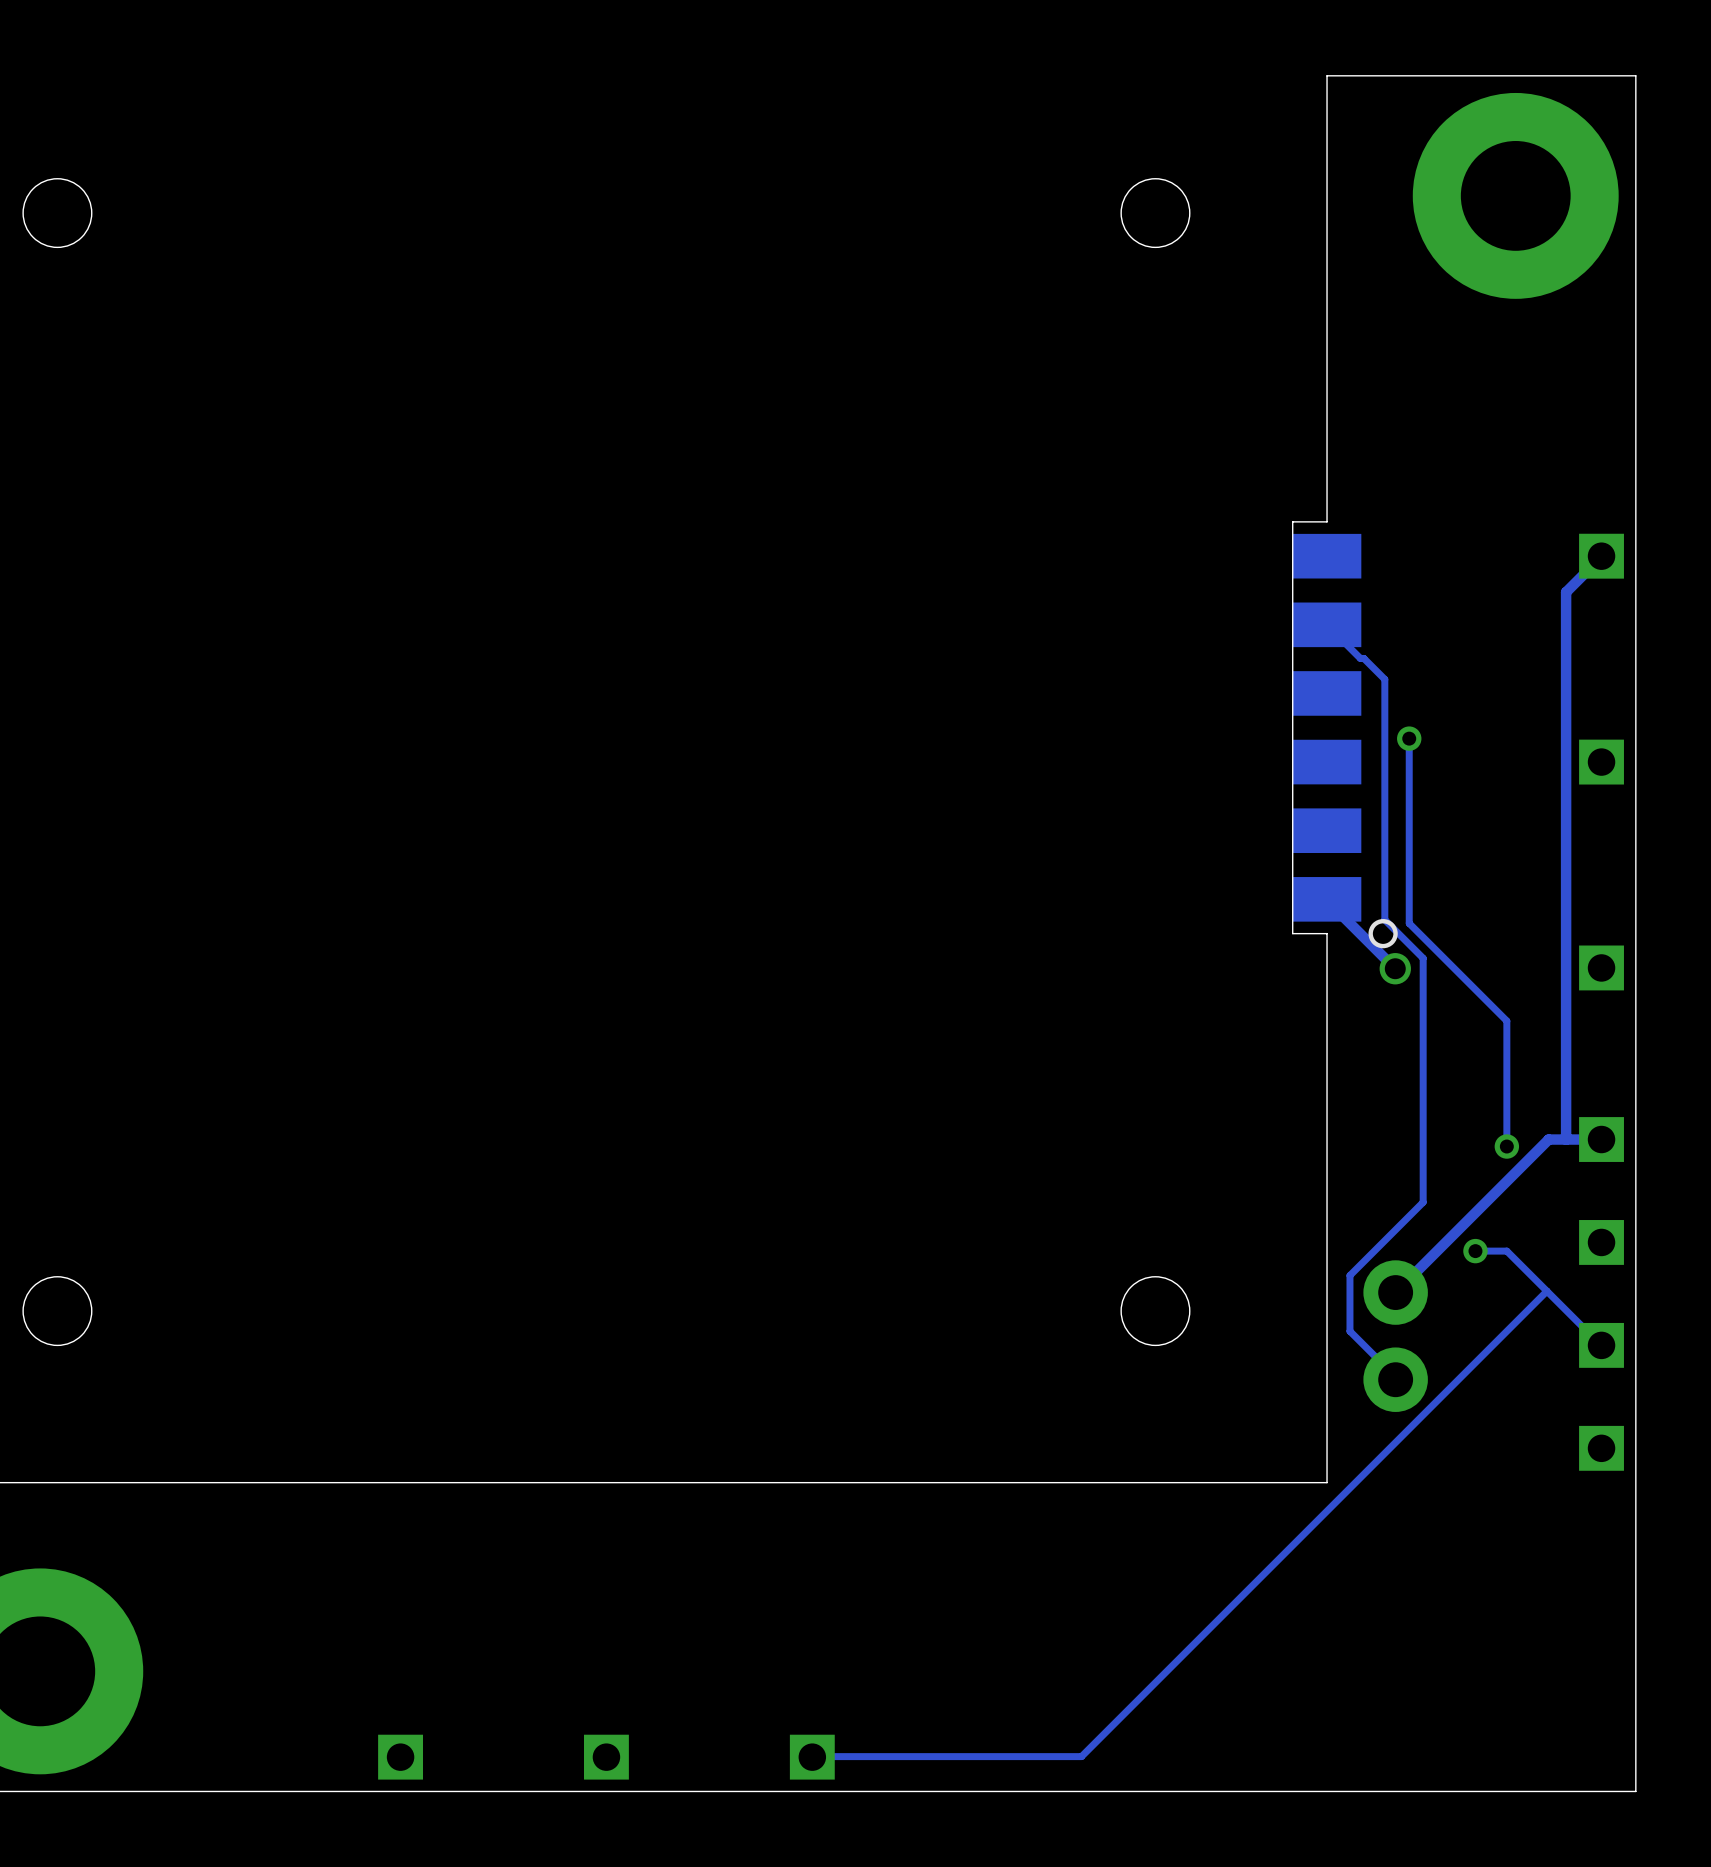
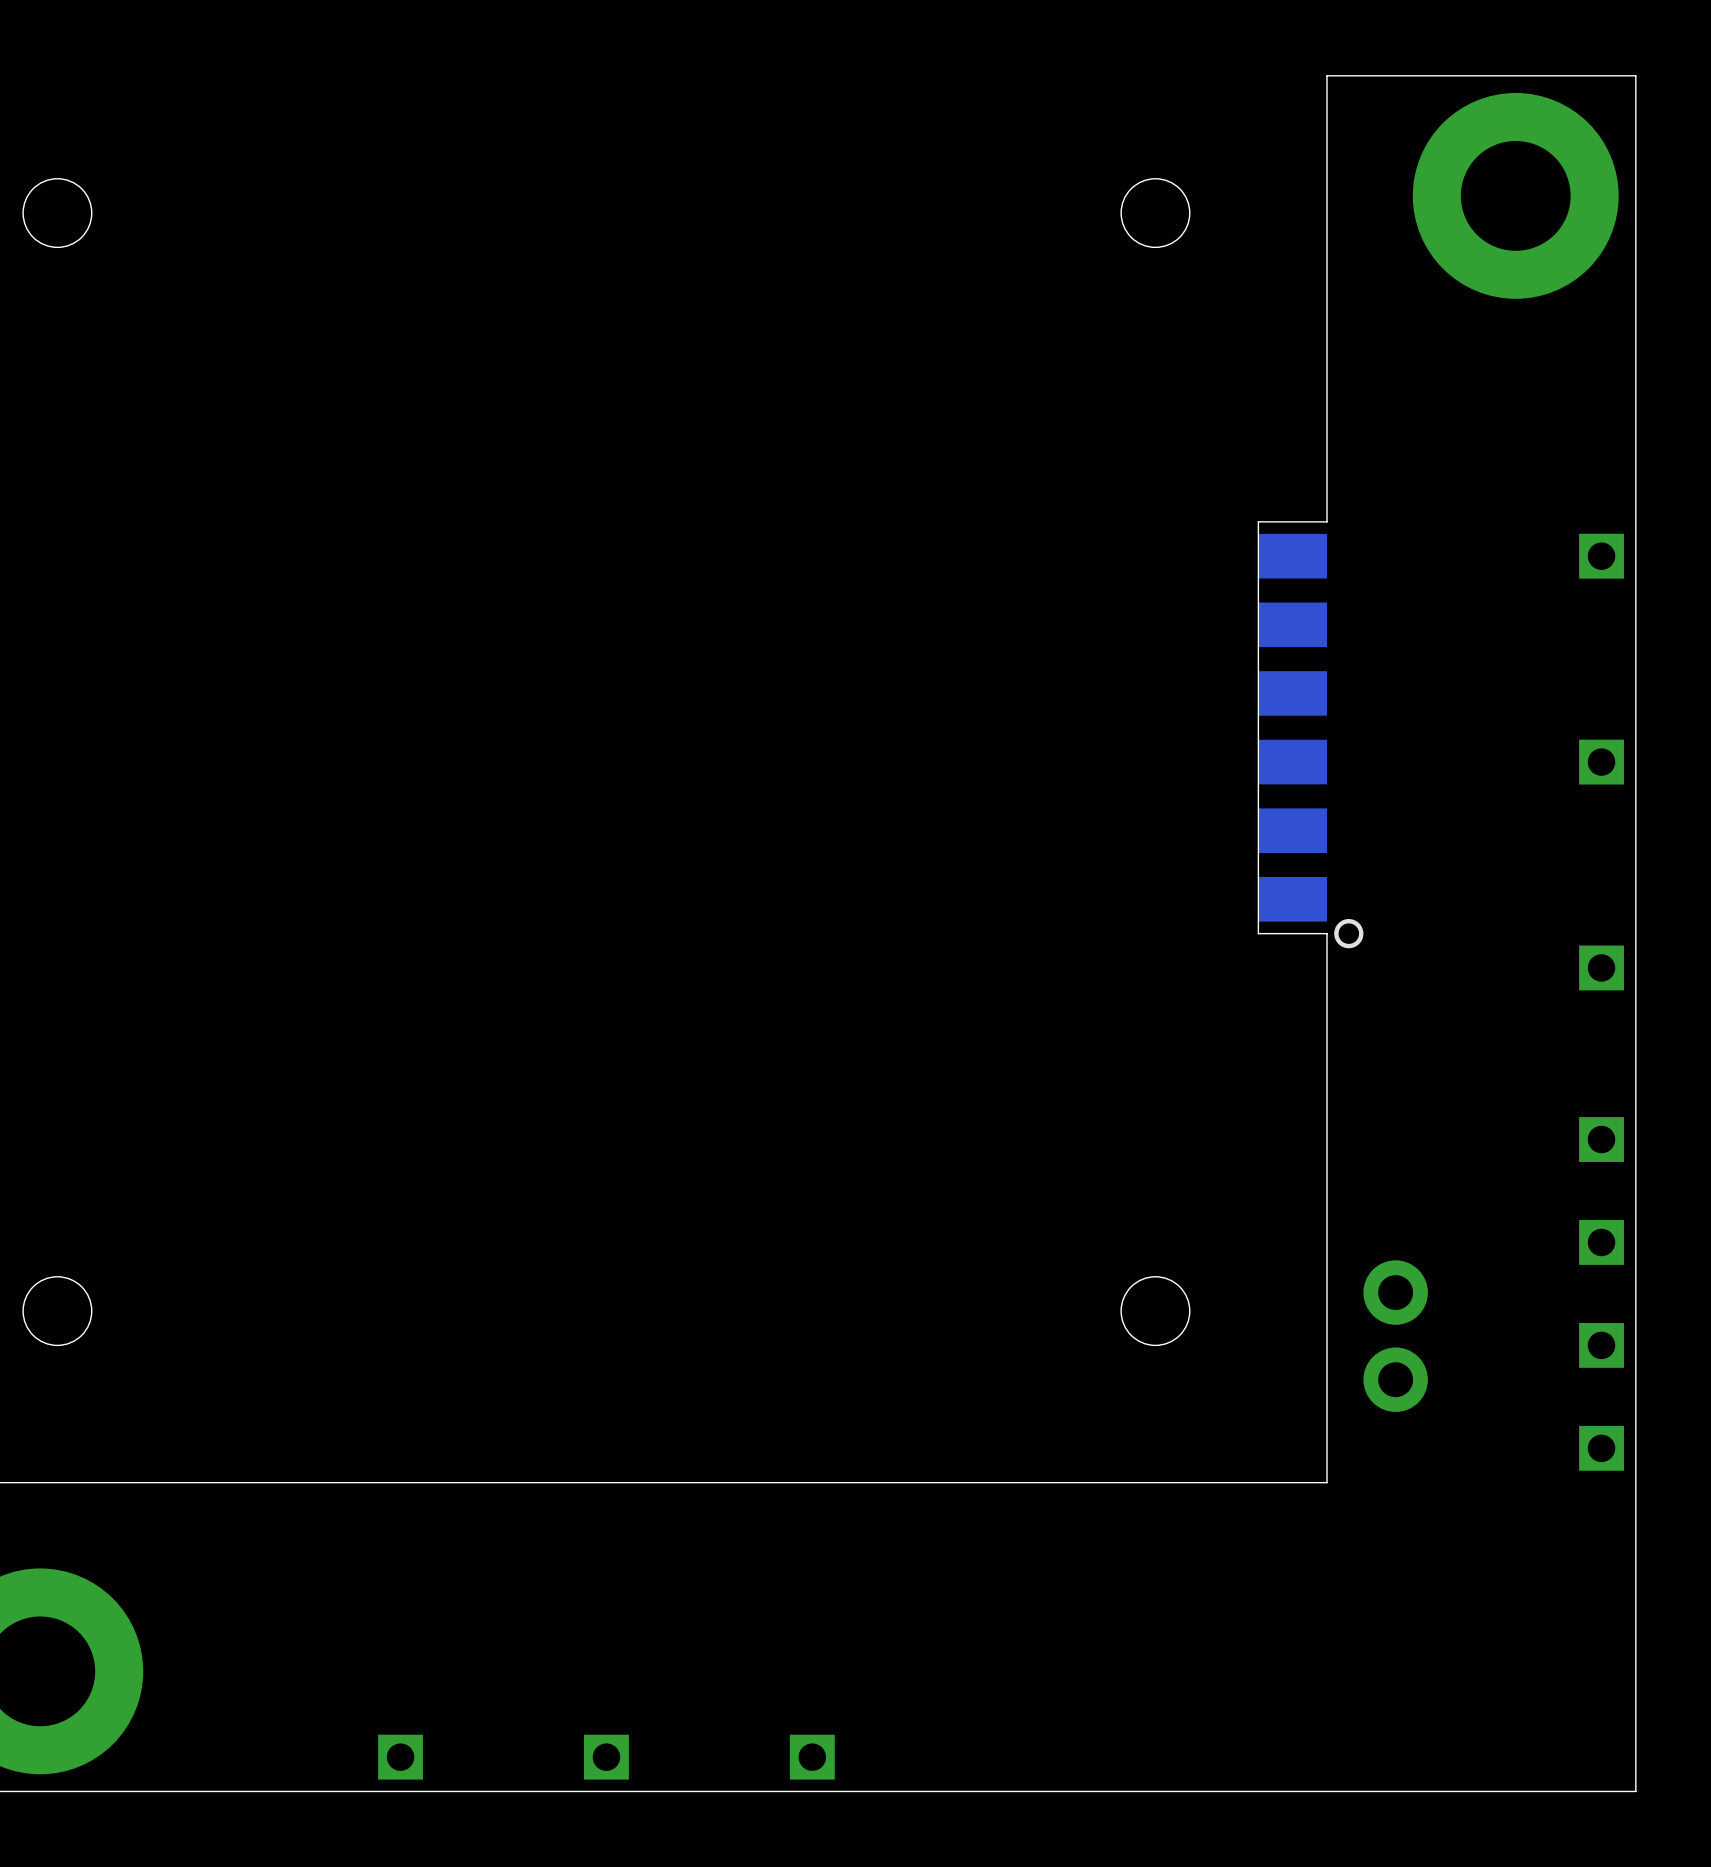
board edge: (1292, 521) (1292, 933) -> (1292, 521) (1258, 521) (1258, 933) (1292, 933)
track: (1601, 556) (1566, 592) (1566, 1139) -> none
track: (1327, 624) (1360, 658) (1363, 658) (1384, 679) (1384, 919) (1423, 958) (1423, 1202) (1349, 1275) (1349, 1331) (1395, 1376) (1395, 1379) -> none
track: (1409, 738) (1409, 923) (1506, 1021) (1506, 1146) -> none
via: (1409, 738) -> none
part position: (1345, 741) -> (1310, 741)
track: (1327, 899) (1395, 968) -> none
via: (1395, 968) -> none
track: (1600, 1139) (1548, 1139) (1395, 1292) -> none
via: (1506, 1146) -> none
track: (1475, 1251) (1506, 1251) (1600, 1345) -> none
via: (1475, 1251) -> none
track: (1546, 1291) (1081, 1756) (812, 1757) -> none

